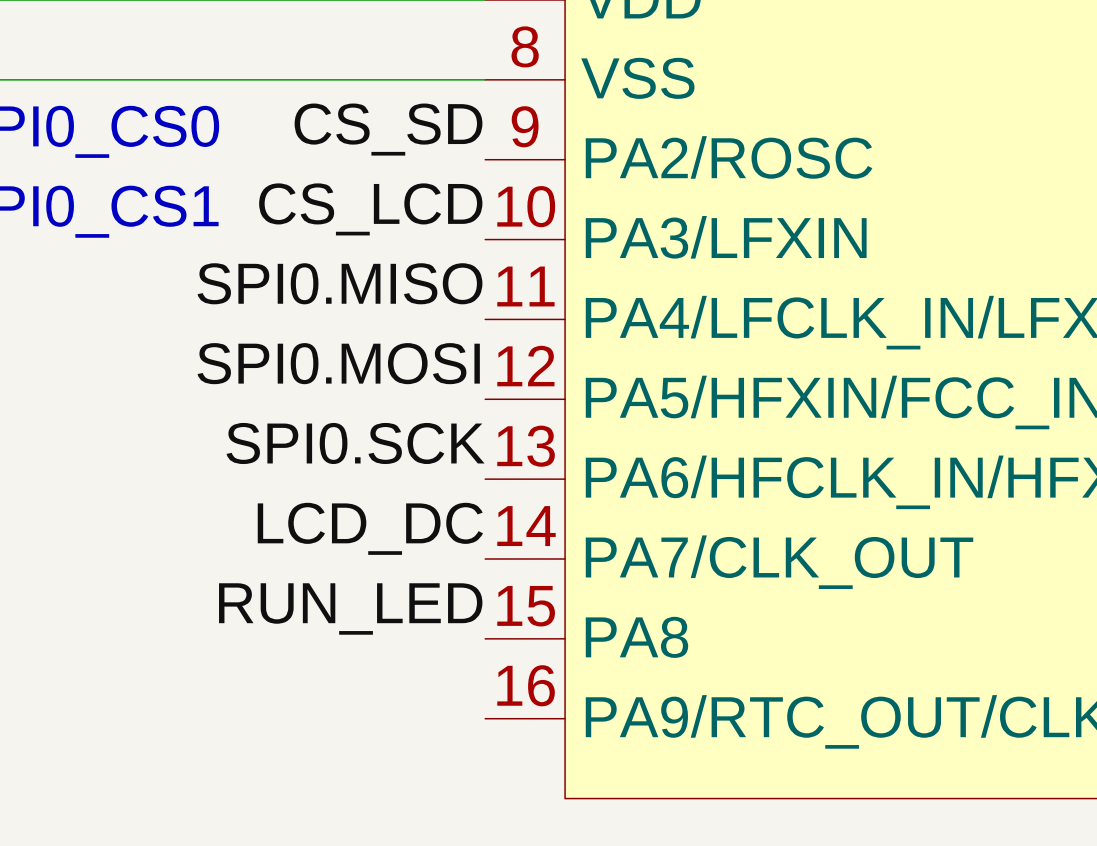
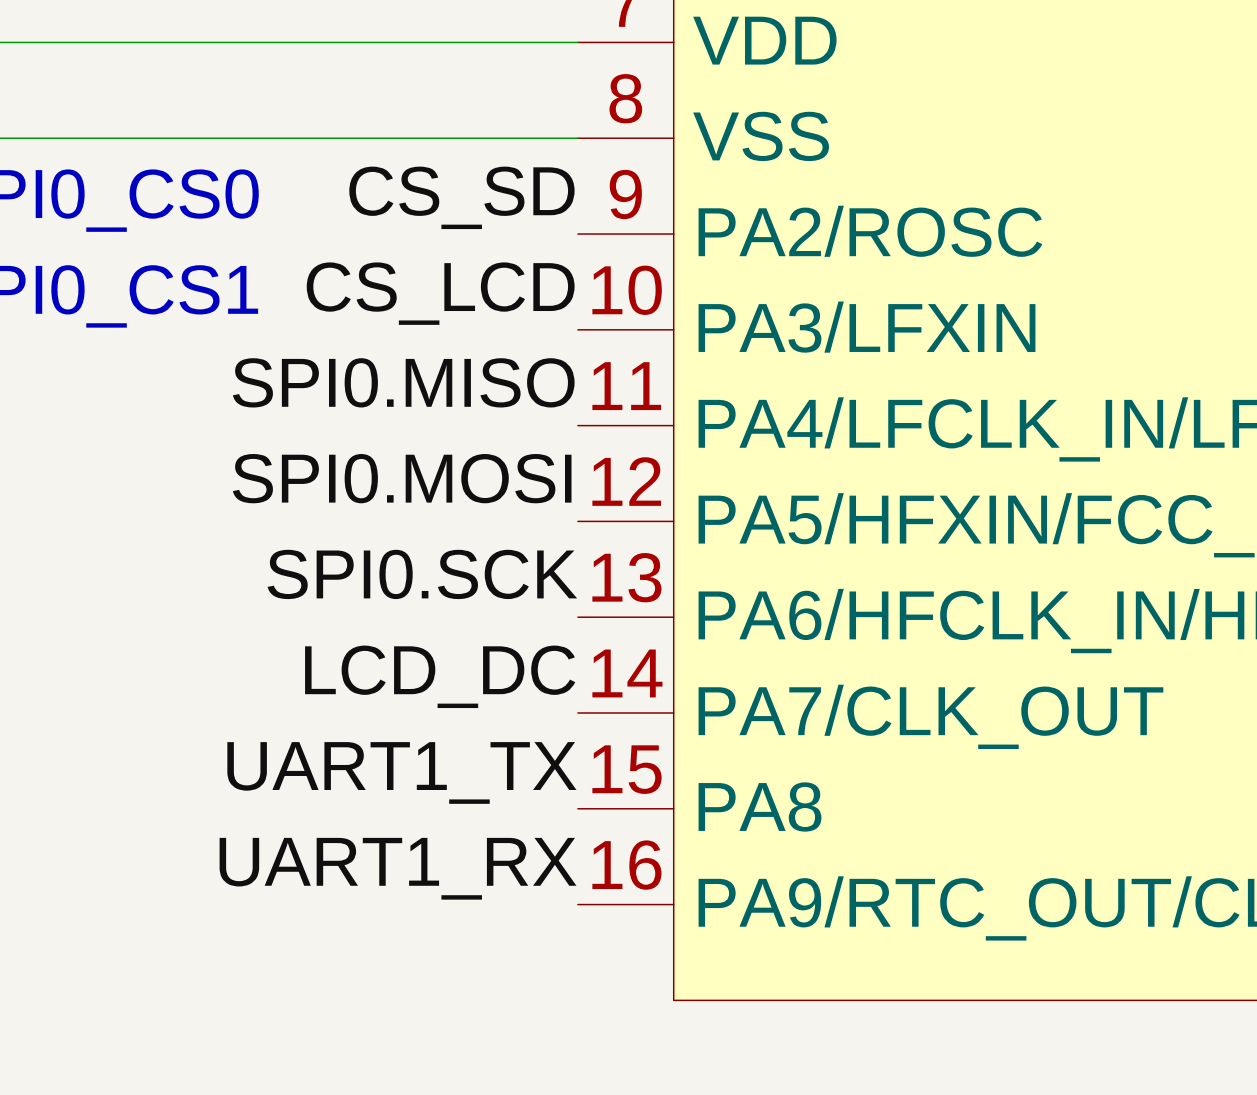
label: RUN_LED (350, 608) -> UART1_TX (401, 772)
label: none -> UART1_RX (398, 868)

